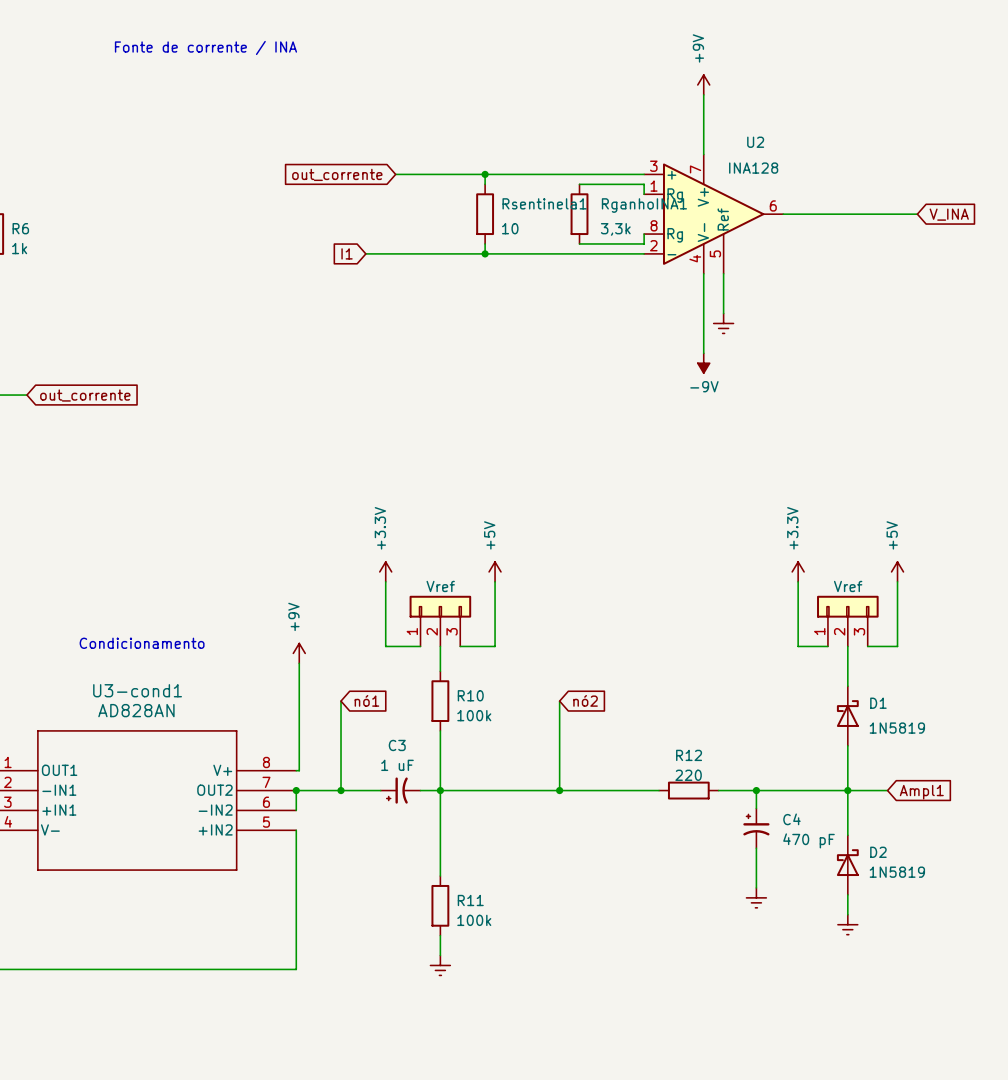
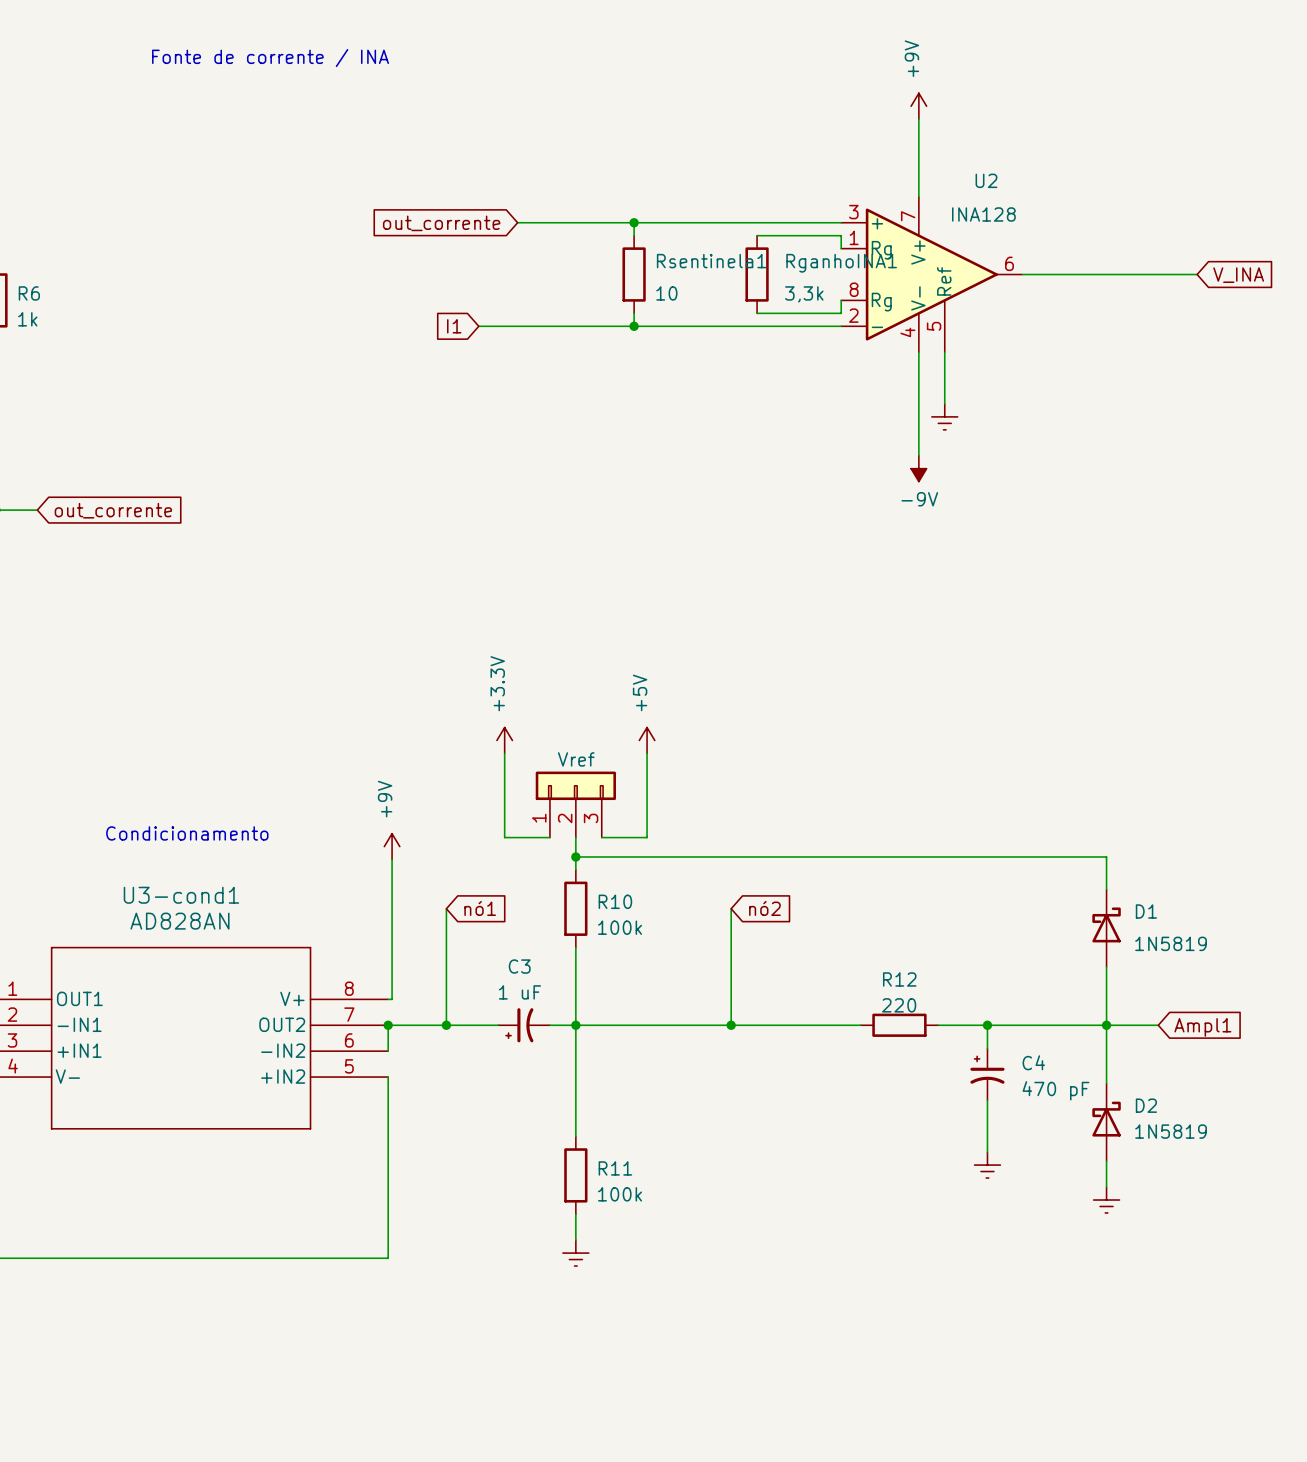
power symbol: +3.3V (798, 571) -> none
power symbol: +5V (897, 571) -> none
wire: (798, 581) (798, 646) (827, 646) -> none
wire: (897, 581) (897, 646) (867, 646) -> none
part: Vref (847, 621) -> none
wire: (847, 646) (847, 661) -> (575, 856) (1106, 856)
junction: none -> (575, 856)

